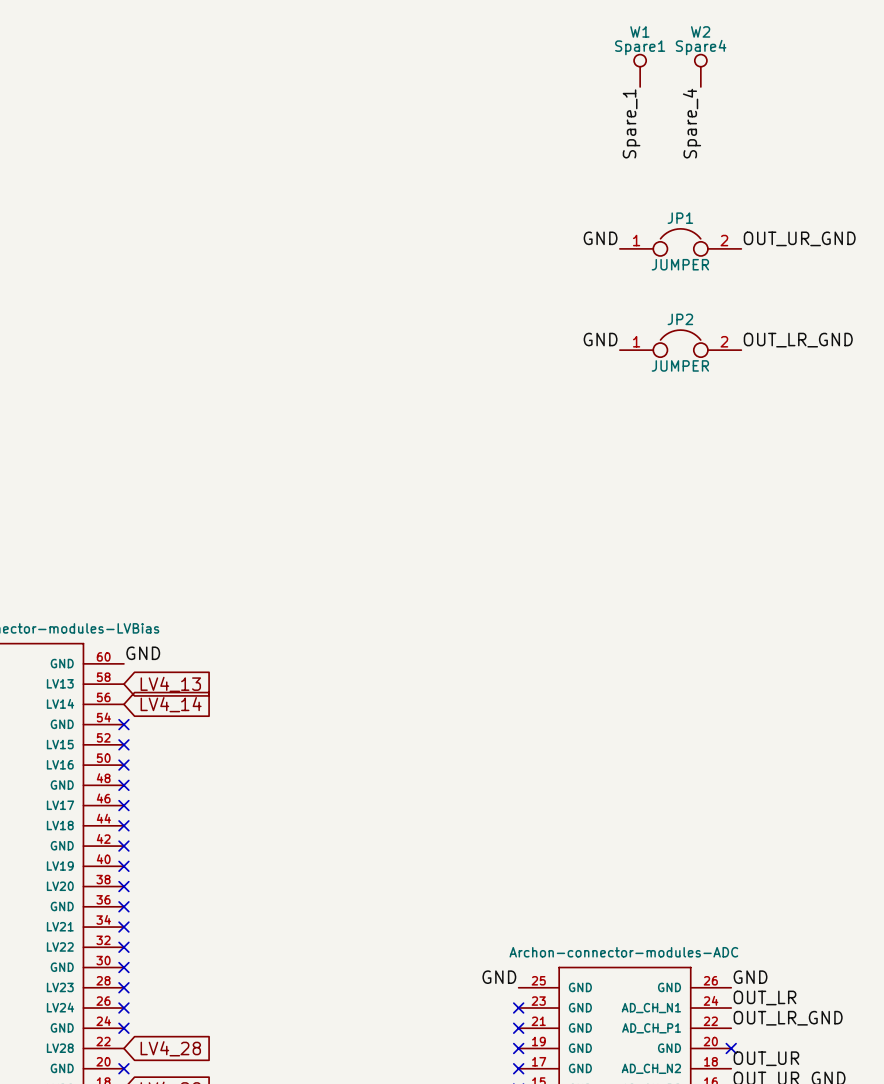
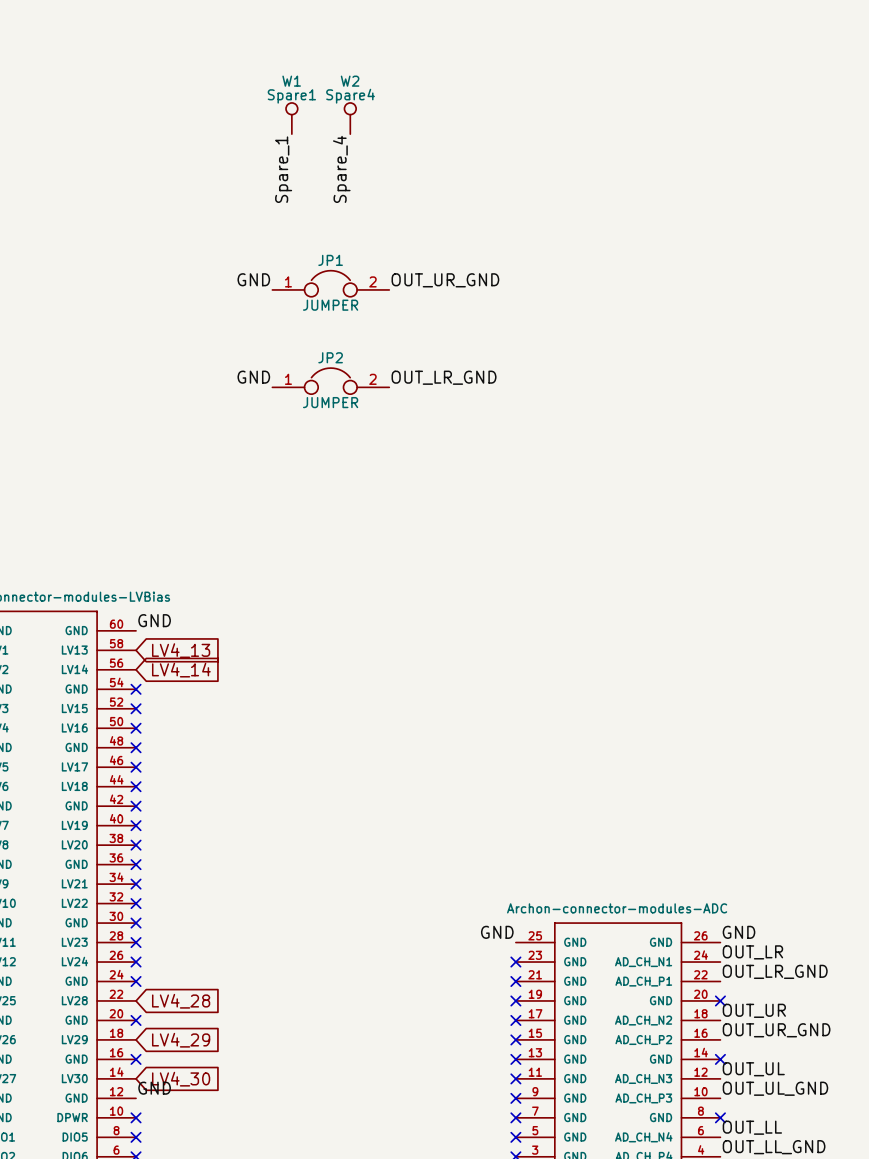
W1 position: (640, 70) -> (291, 118)
W2 position: (700, 70) -> (350, 118)
label: Spare_1 (631, 123) -> none
label: Spare_4 (692, 123) -> none
label: none -> Spare_1 (283, 169)
label: none -> Spare_4 (341, 169)
label: GND (600, 238) -> none
label: OUT_UR_GND (799, 238) -> none
JP1 position: (680, 242) -> (330, 283)
label: none -> GND (253, 279)
label: none -> OUT_UR_GND (445, 280)
label: GND (600, 339) -> none
label: OUT_LR_GND (798, 340) -> none
JP2 position: (680, 343) -> (330, 381)
label: none -> GND (253, 377)
label: none -> OUT_LR_GND (444, 377)

